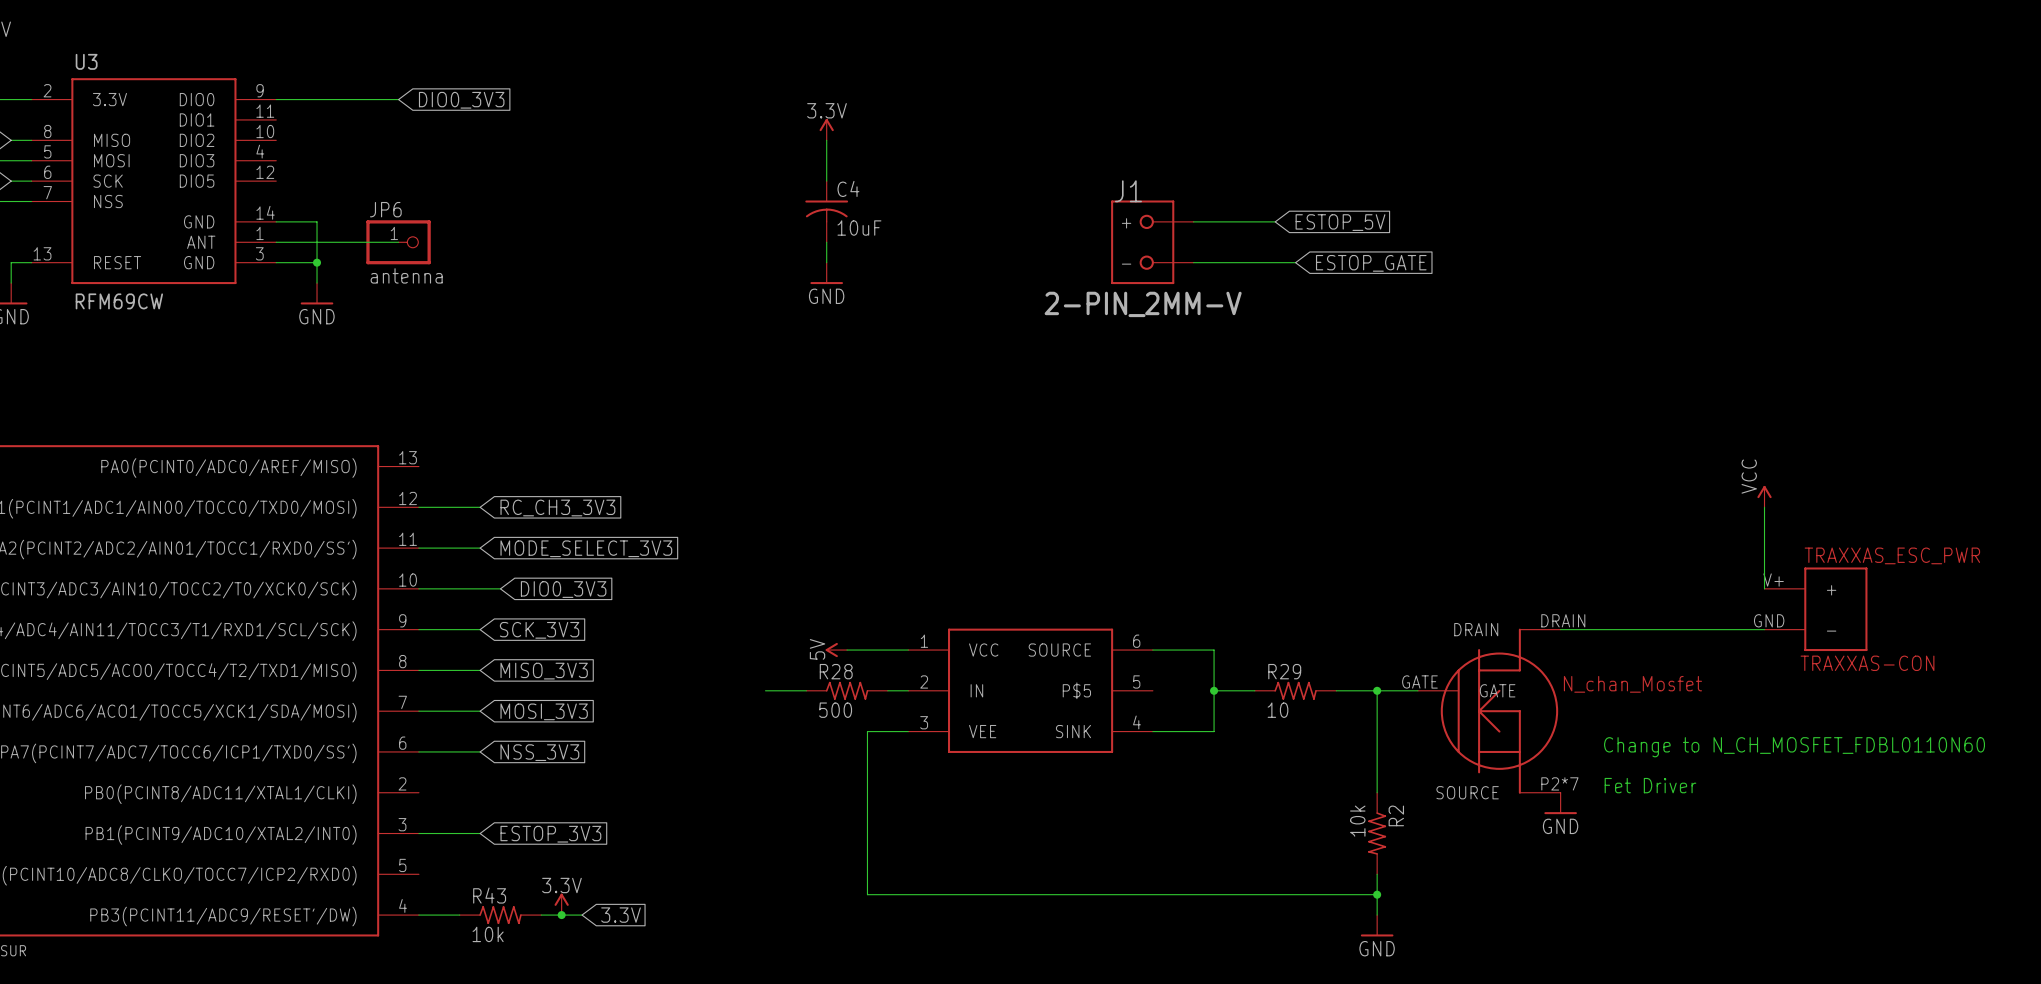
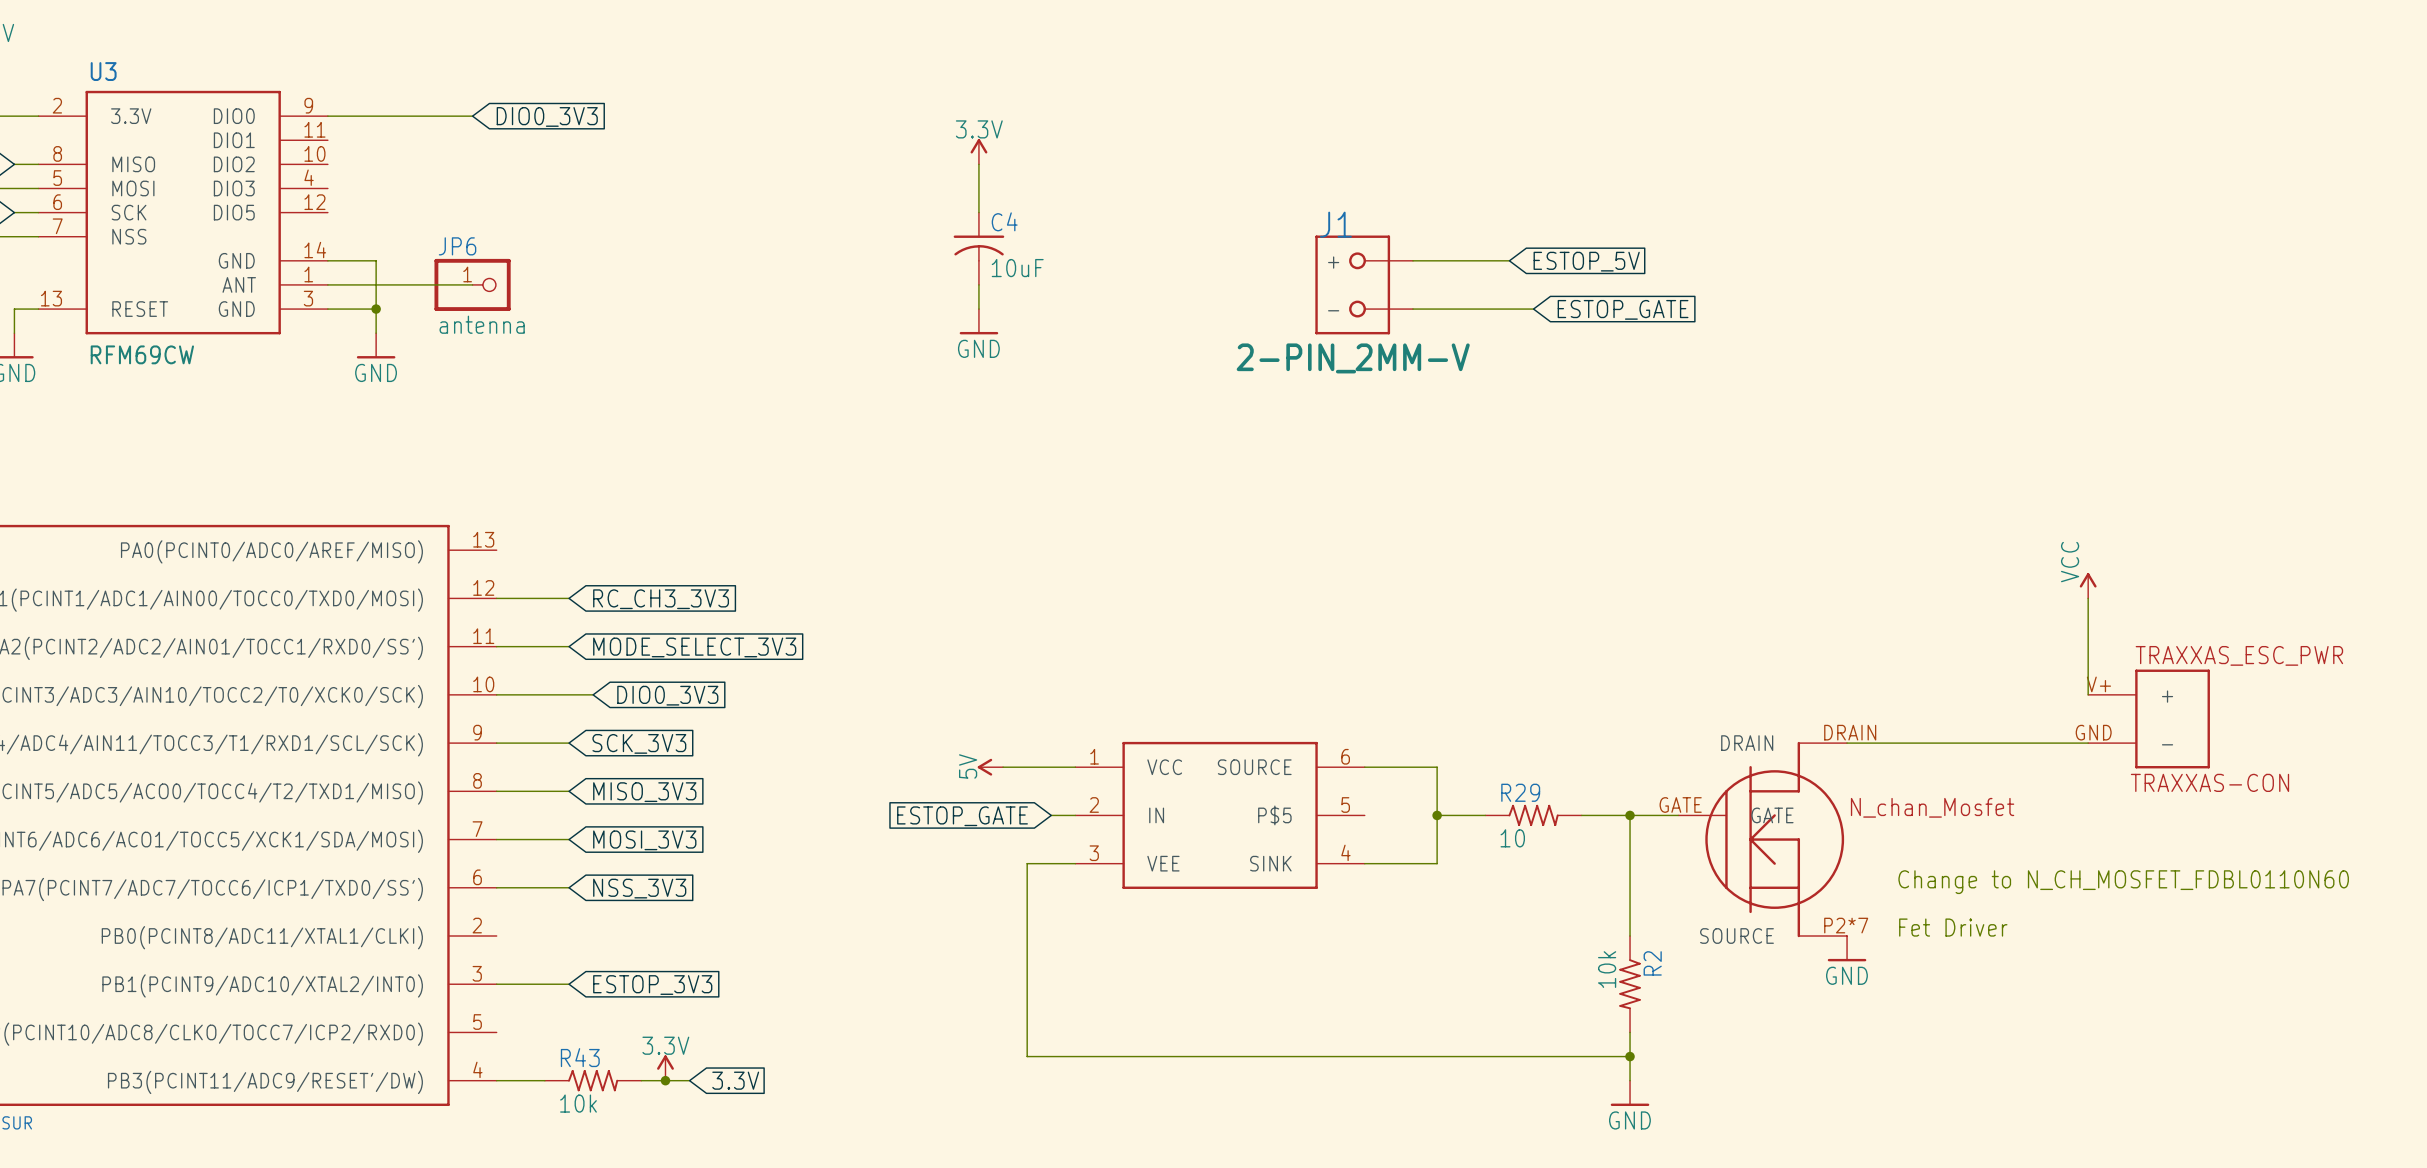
wire: (765, 690) (806, 690) -> none
R28: 500 (847, 690) -> none
global label: none -> ESTOP_GATE (962, 816)

